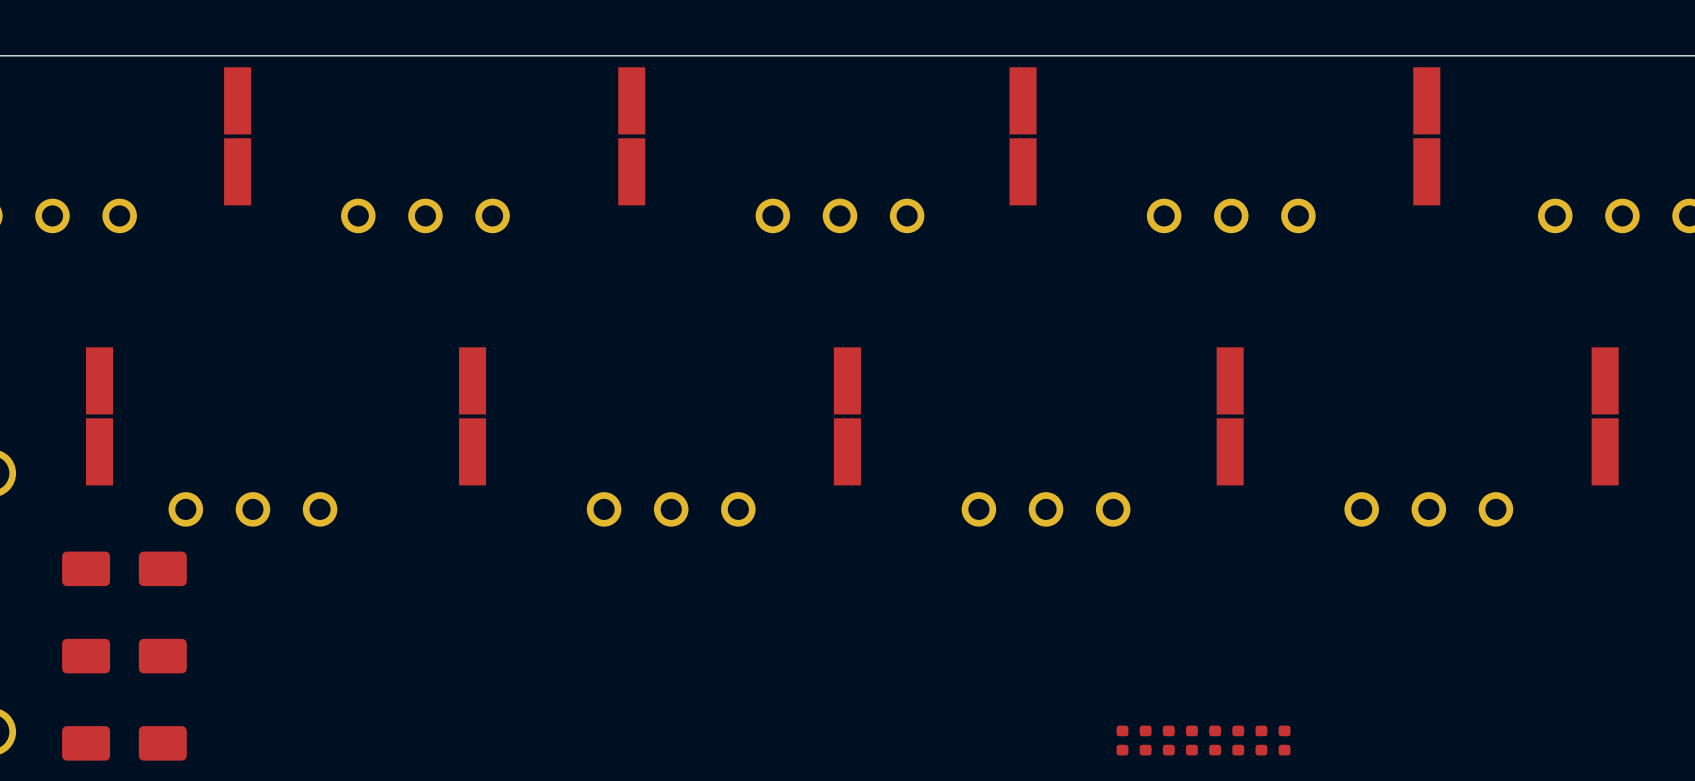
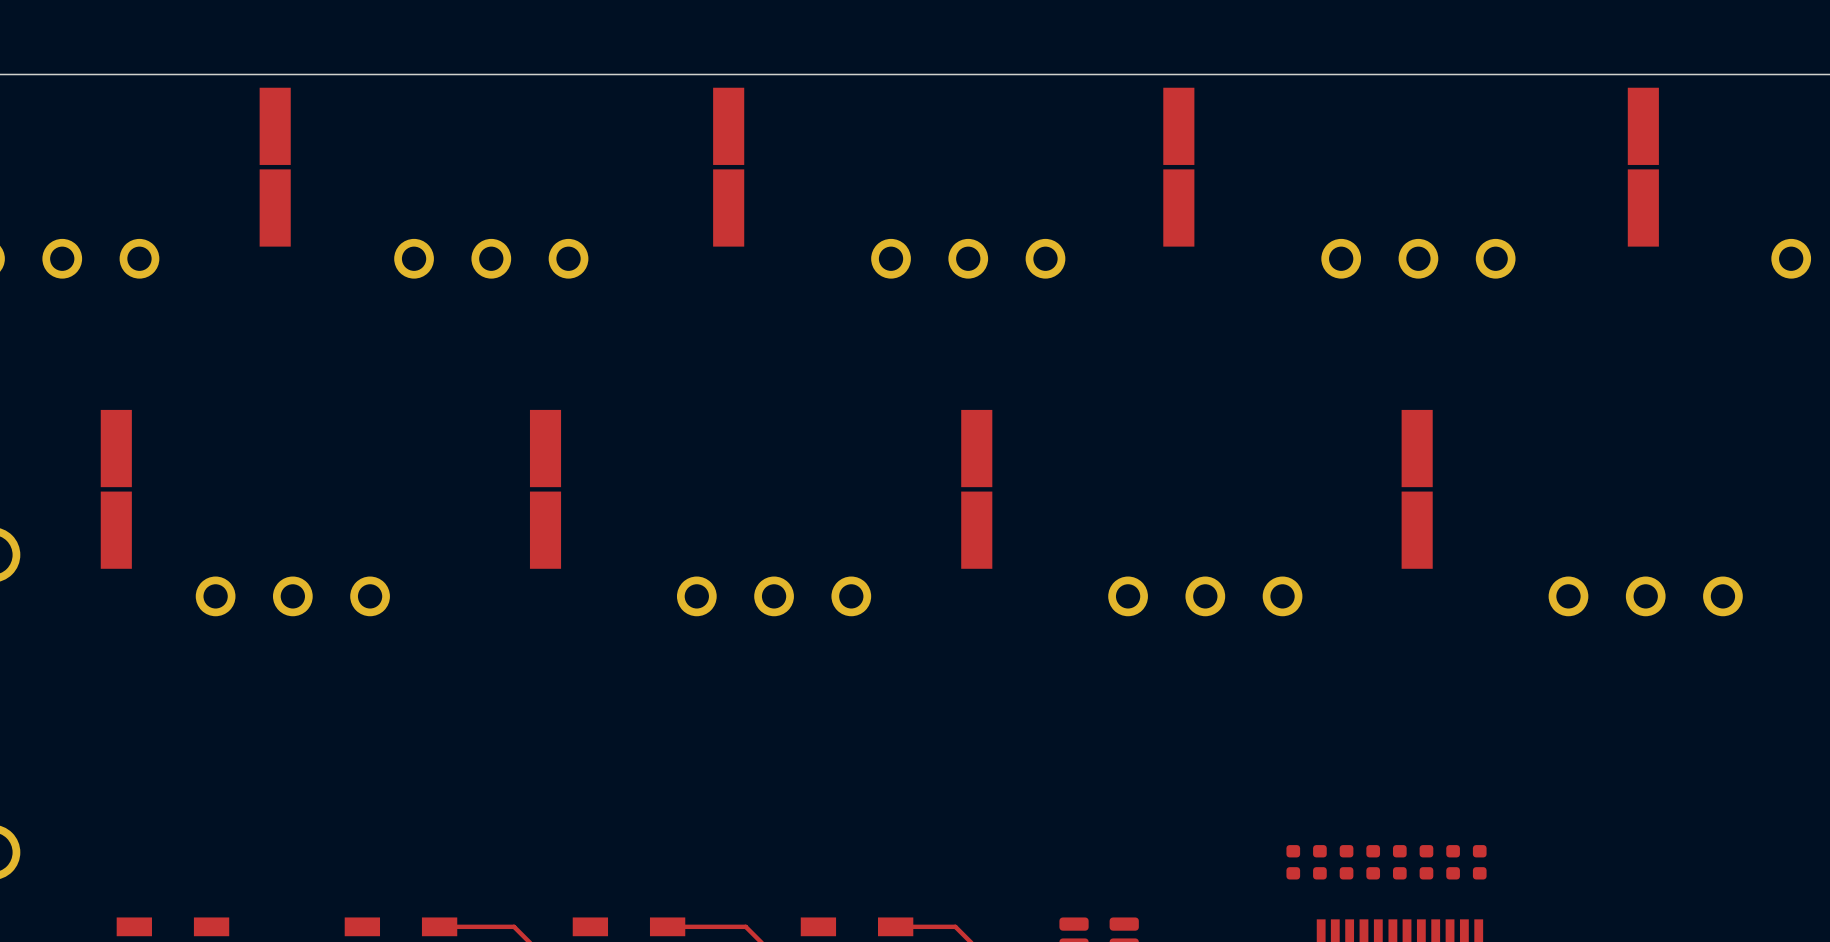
part: (124, 568) -> none
part: (124, 656) -> none
part: (124, 743) -> none

